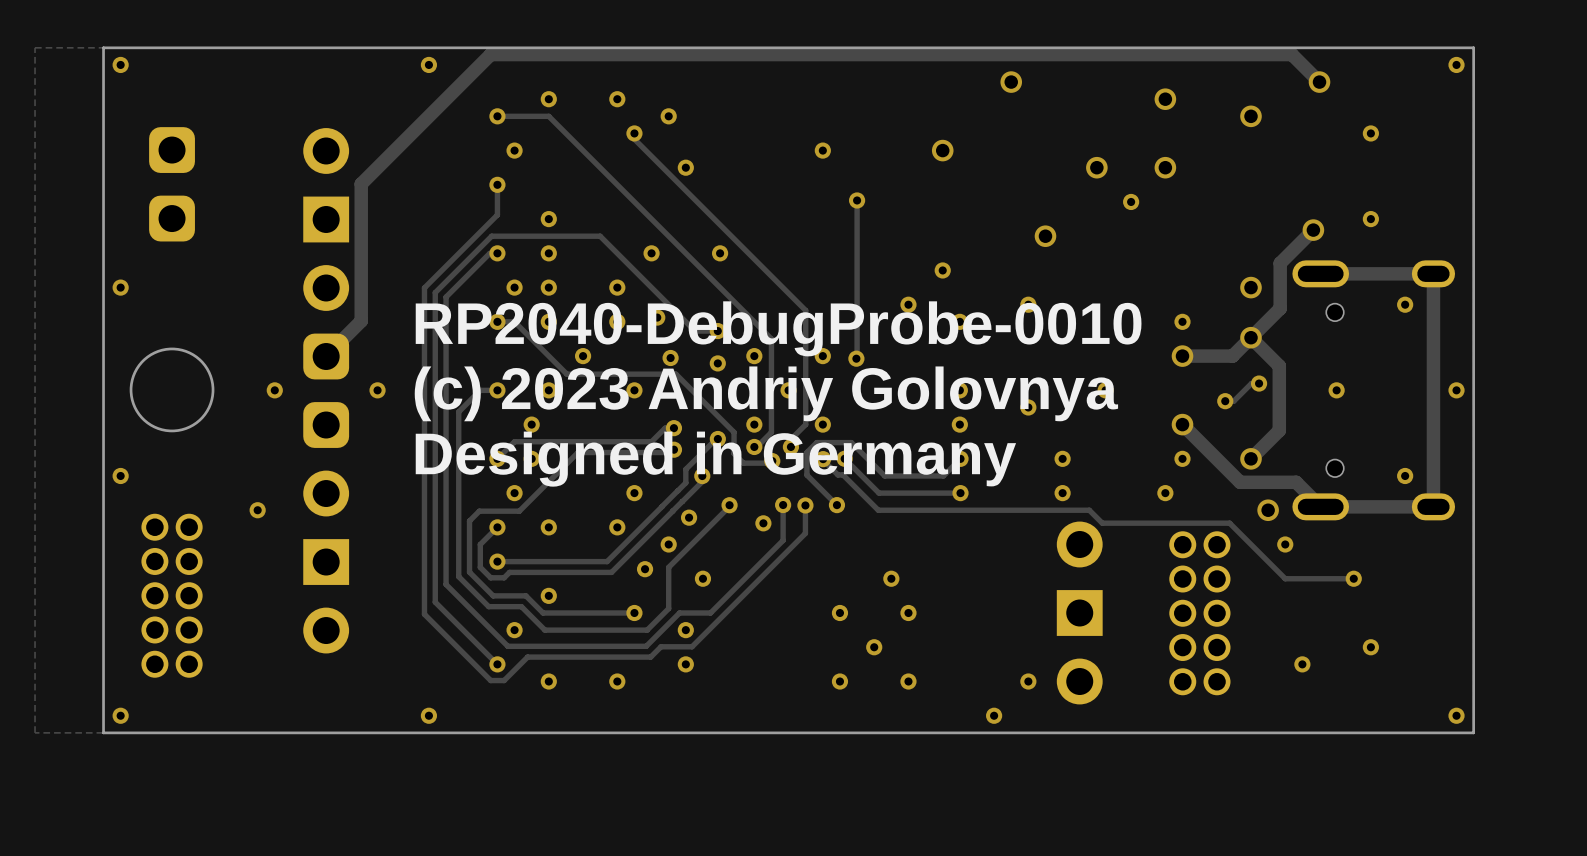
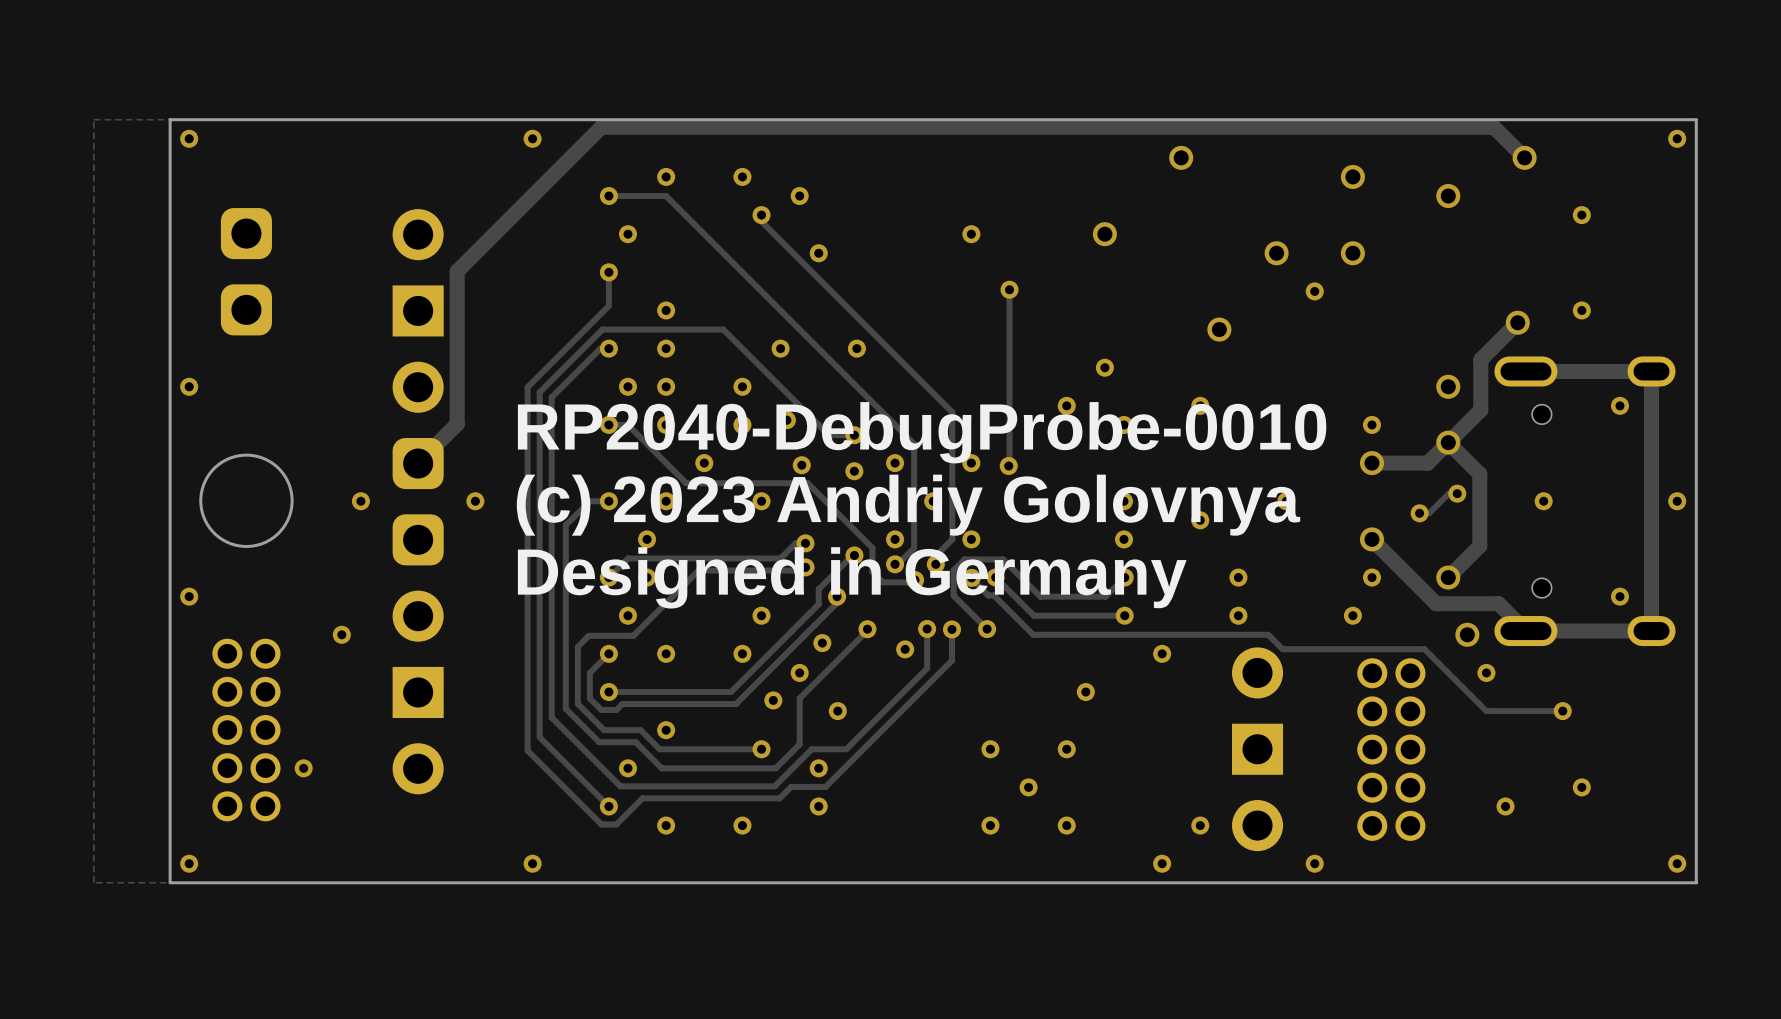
via: none -> (1162, 653)
via position: (891, 578) -> (1085, 692)
via: none -> (303, 768)
via: none -> (1314, 863)

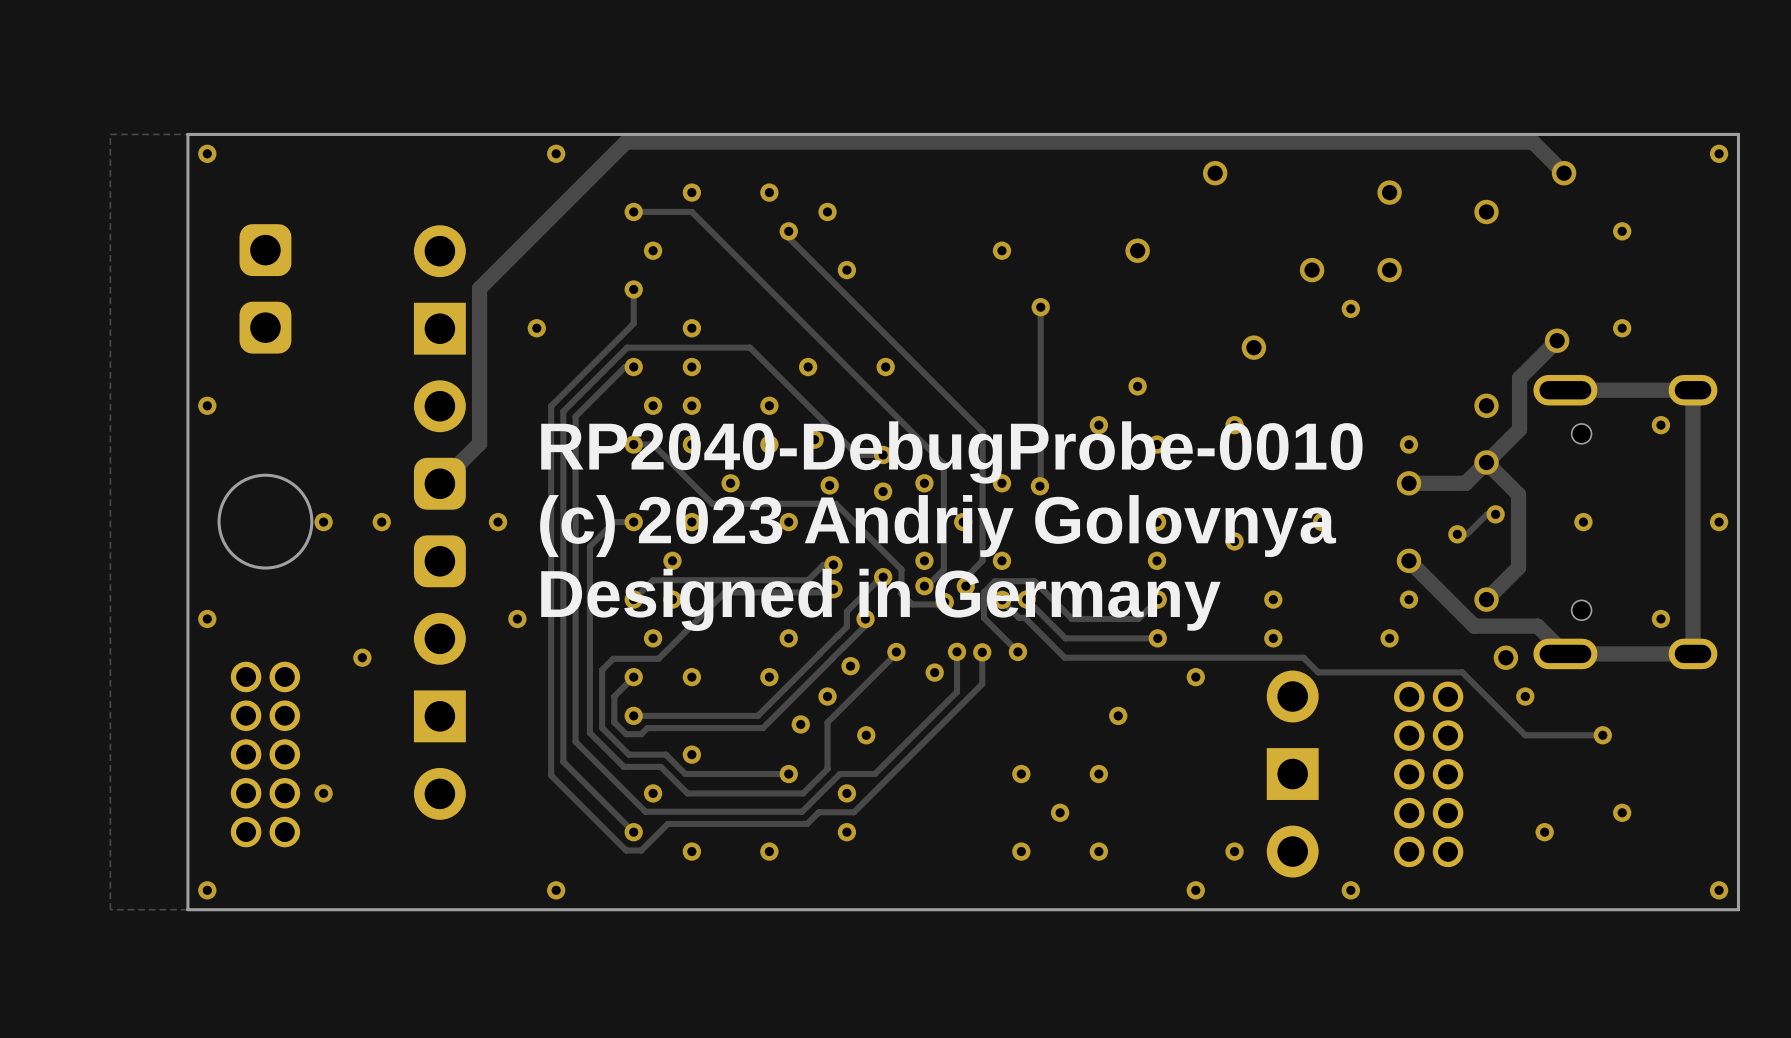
via: none -> (536, 328)
via: none -> (323, 522)
via: none -> (517, 618)

